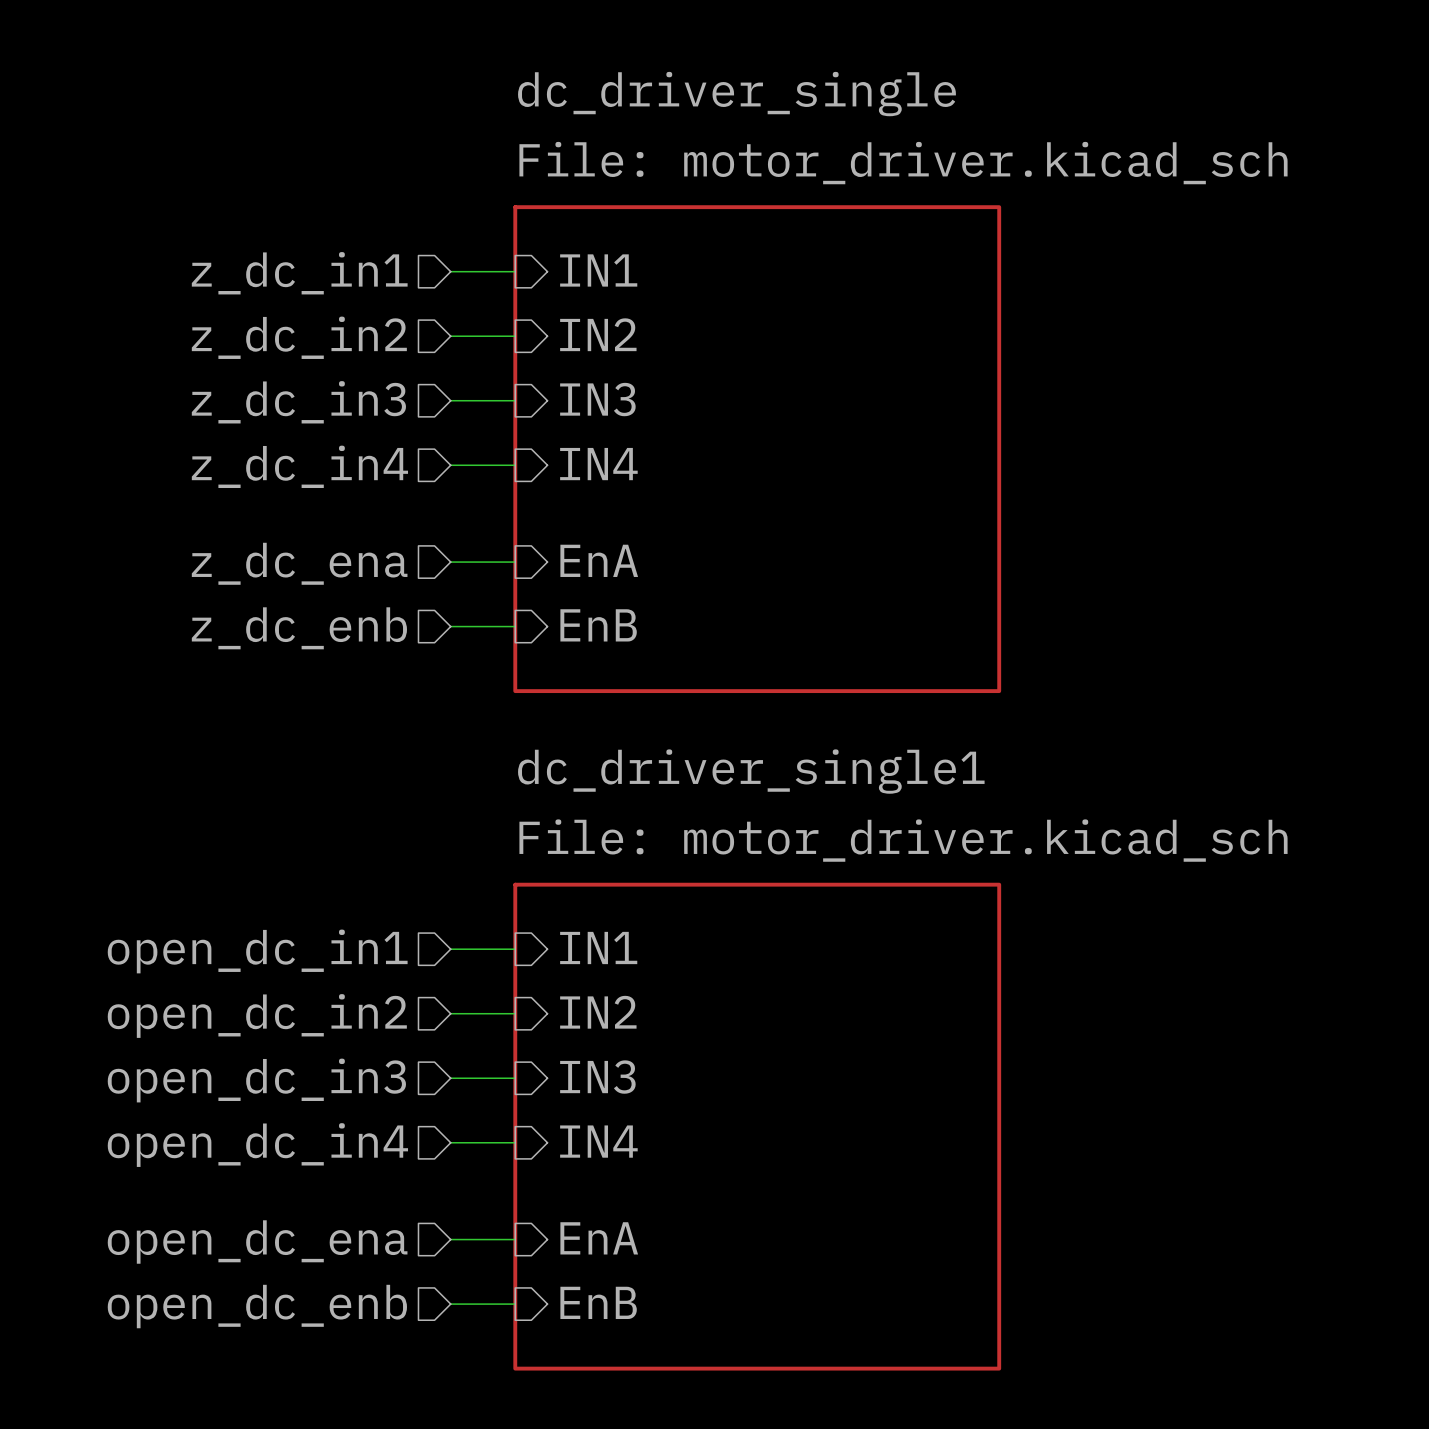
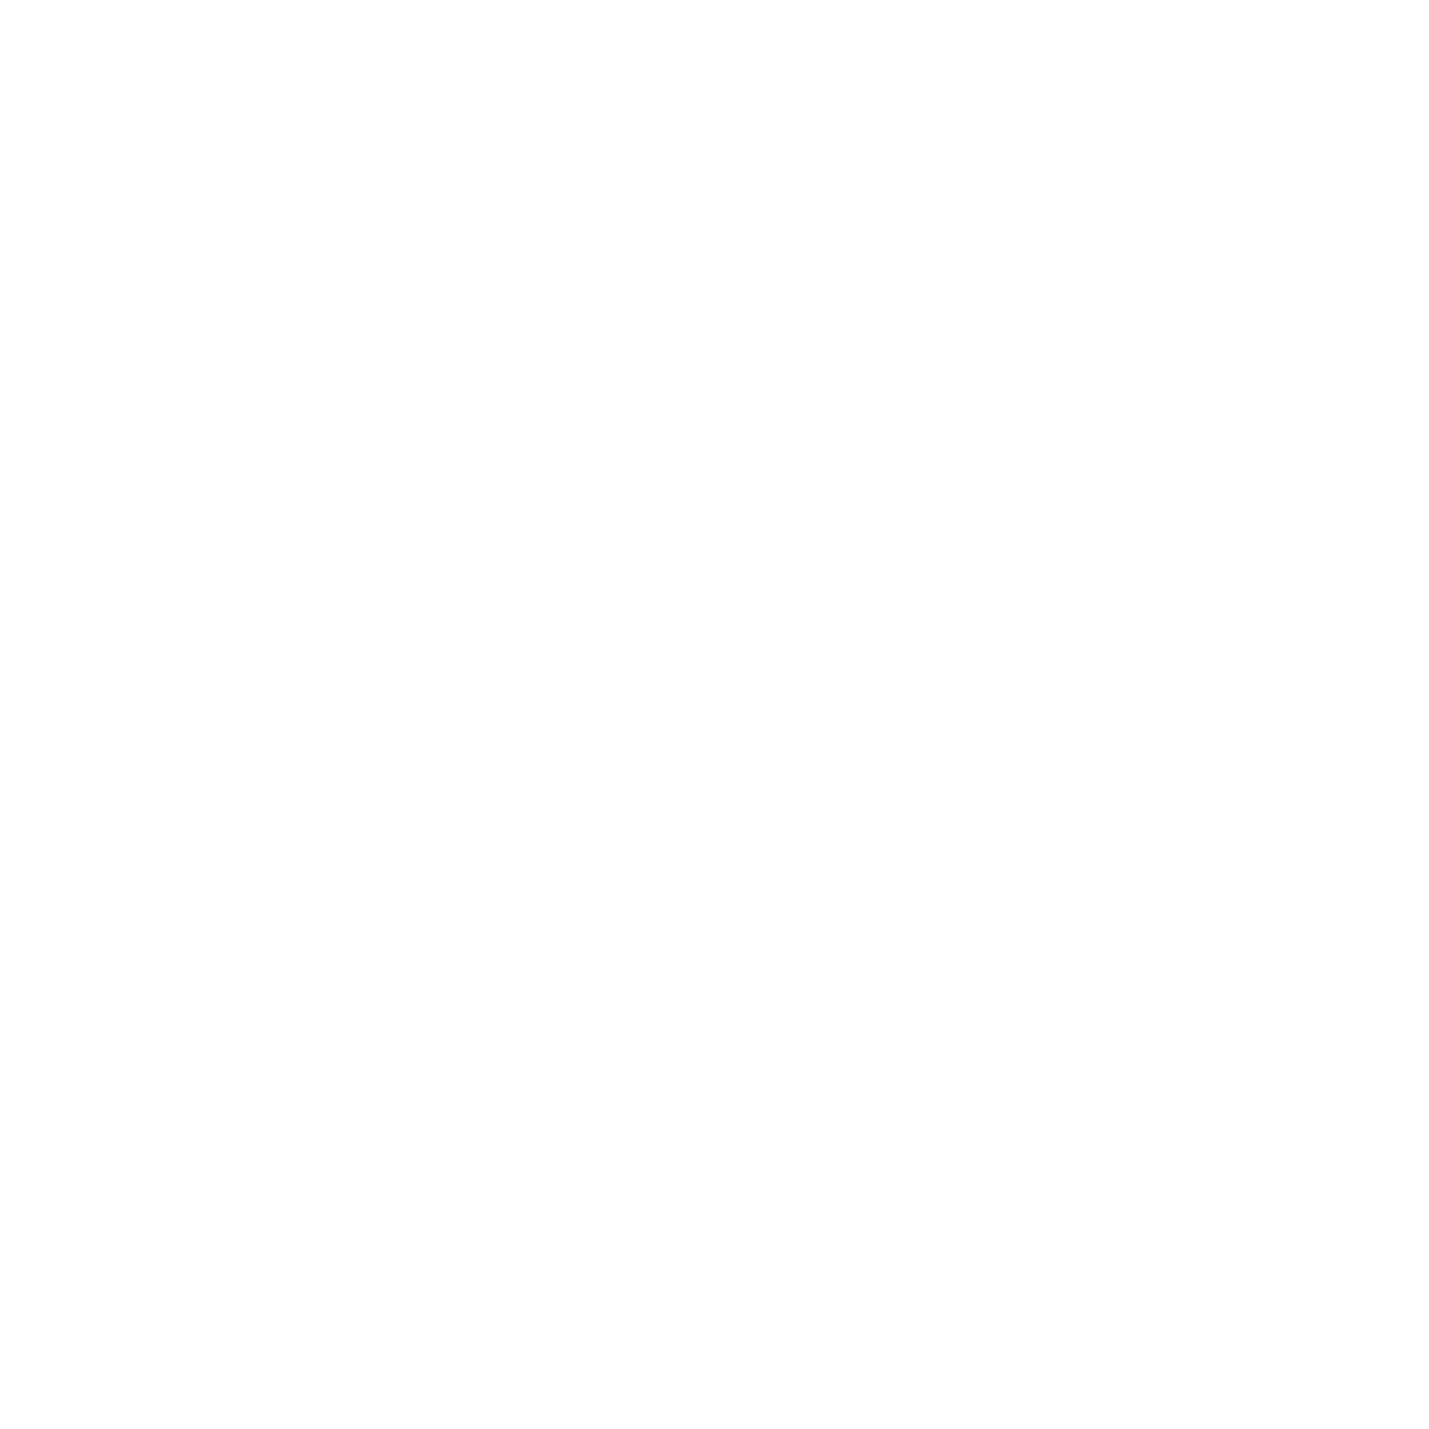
sheet pin: IN1 (598, 270) -> none
wire: (450, 271) (515, 271) -> none
hierarchical label: z_dc_in1 (299, 273) -> none
sheet pin: IN2 (598, 334) -> none
wire: (450, 336) (515, 336) -> none
hierarchical label: z_dc_in2 (299, 337) -> none
sheet pin: IN3 (597, 399) -> none
wire: (450, 400) (515, 400) -> none
hierarchical label: z_dc_in3 (298, 402) -> none
sheet dc_driver_single: File: motor_driver.kicad_sch (757, 449) -> none
sheet pin: IN4 (598, 464) -> none
wire: (450, 465) (515, 465) -> none
hierarchical label: z_dc_in4 (299, 466) -> none
sheet pin: EnA (599, 560) -> none
wire: (450, 562) (515, 562) -> none
hierarchical label: z_dc_ena (299, 563) -> none
sheet pin: EnB (598, 625) -> none
wire: (450, 626) (515, 626) -> none
hierarchical label: z_dc_enb (299, 628) -> none
sheet pin: IN1 (598, 947) -> none
wire: (450, 949) (515, 949) -> none
hierarchical label: open_dc_in1 (257, 951) -> none
sheet pin: IN2 (598, 1012) -> none
wire: (450, 1013) (515, 1013) -> none
hierarchical label: open_dc_in2 (257, 1015) -> none
sheet pin: IN3 (597, 1077) -> none
wire: (450, 1078) (515, 1078) -> none
hierarchical label: open_dc_in3 (256, 1080) -> none
sheet dc_driver_single1: File: motor_driver.kicad_sch (757, 1126) -> none
sheet pin: IN4 (598, 1141) -> none
wire: (450, 1142) (515, 1142) -> none
hierarchical label: open_dc_in4 (257, 1145) -> none
sheet pin: EnA (599, 1238) -> none
wire: (450, 1239) (515, 1239) -> none
hierarchical label: open_dc_ena (257, 1242) -> none
sheet pin: EnB (598, 1302) -> none
wire: (450, 1304) (515, 1304) -> none
hierarchical label: open_dc_enb (257, 1306) -> none

